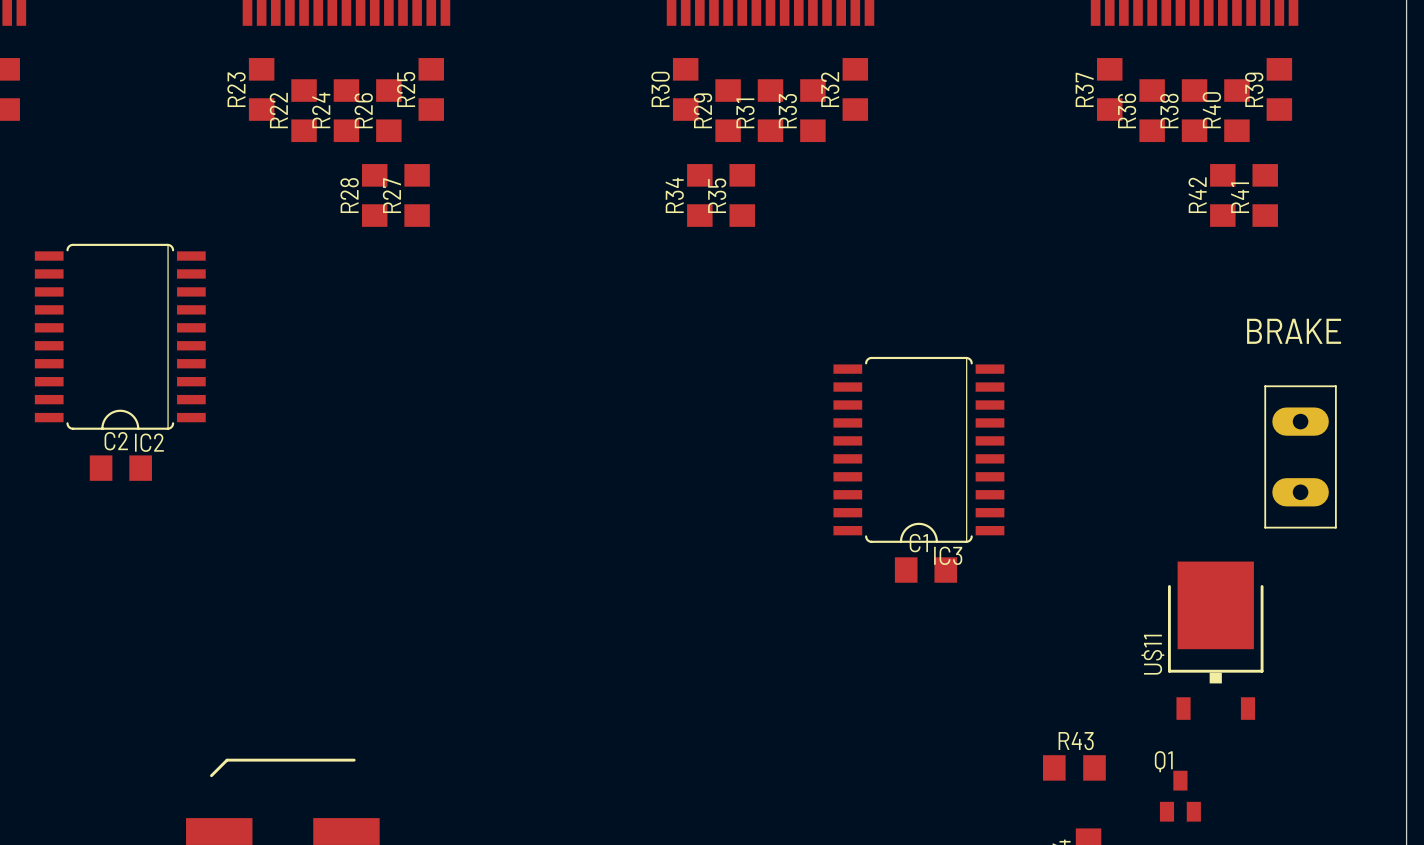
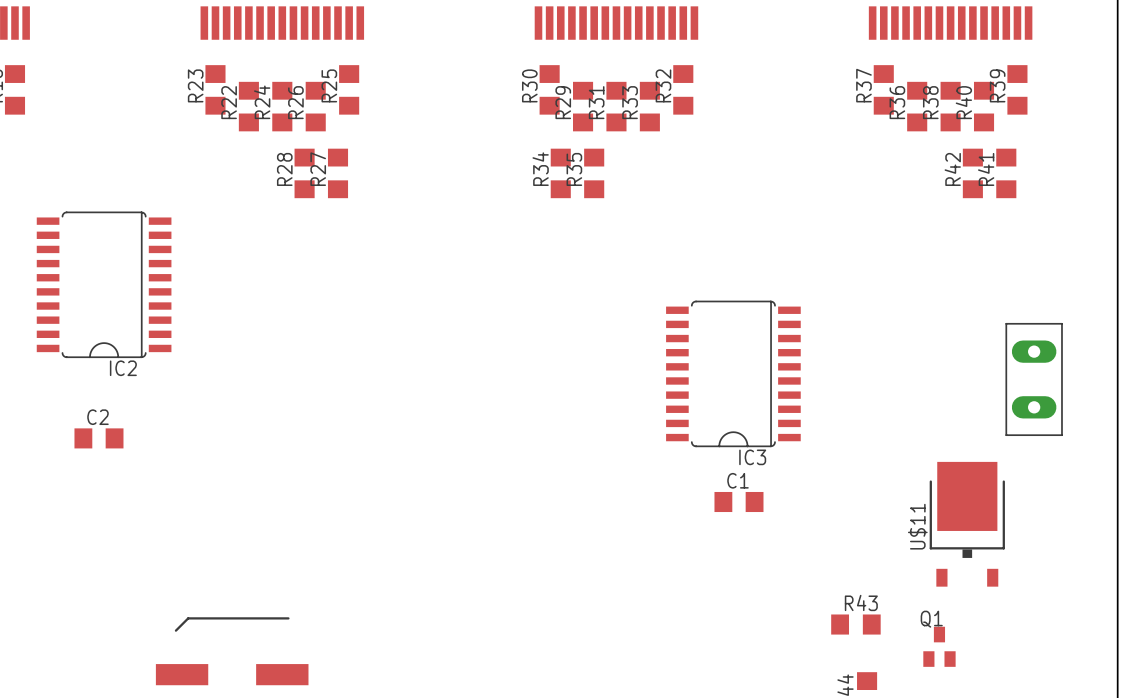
text: BRAKE (1294, 331) -> none
C2 position: (120, 468) -> (98, 438)
C1 position: (925, 570) -> (738, 502)

